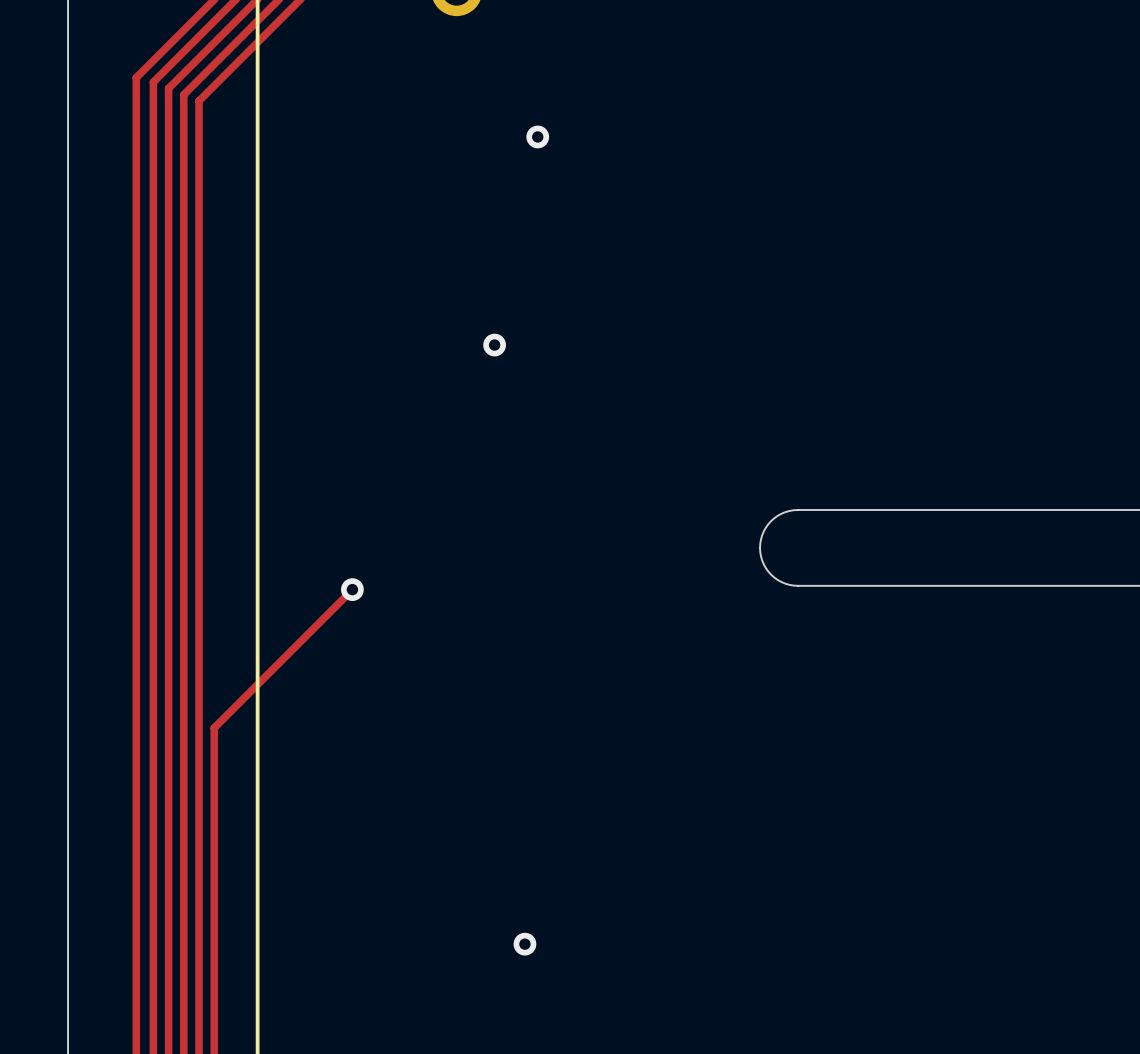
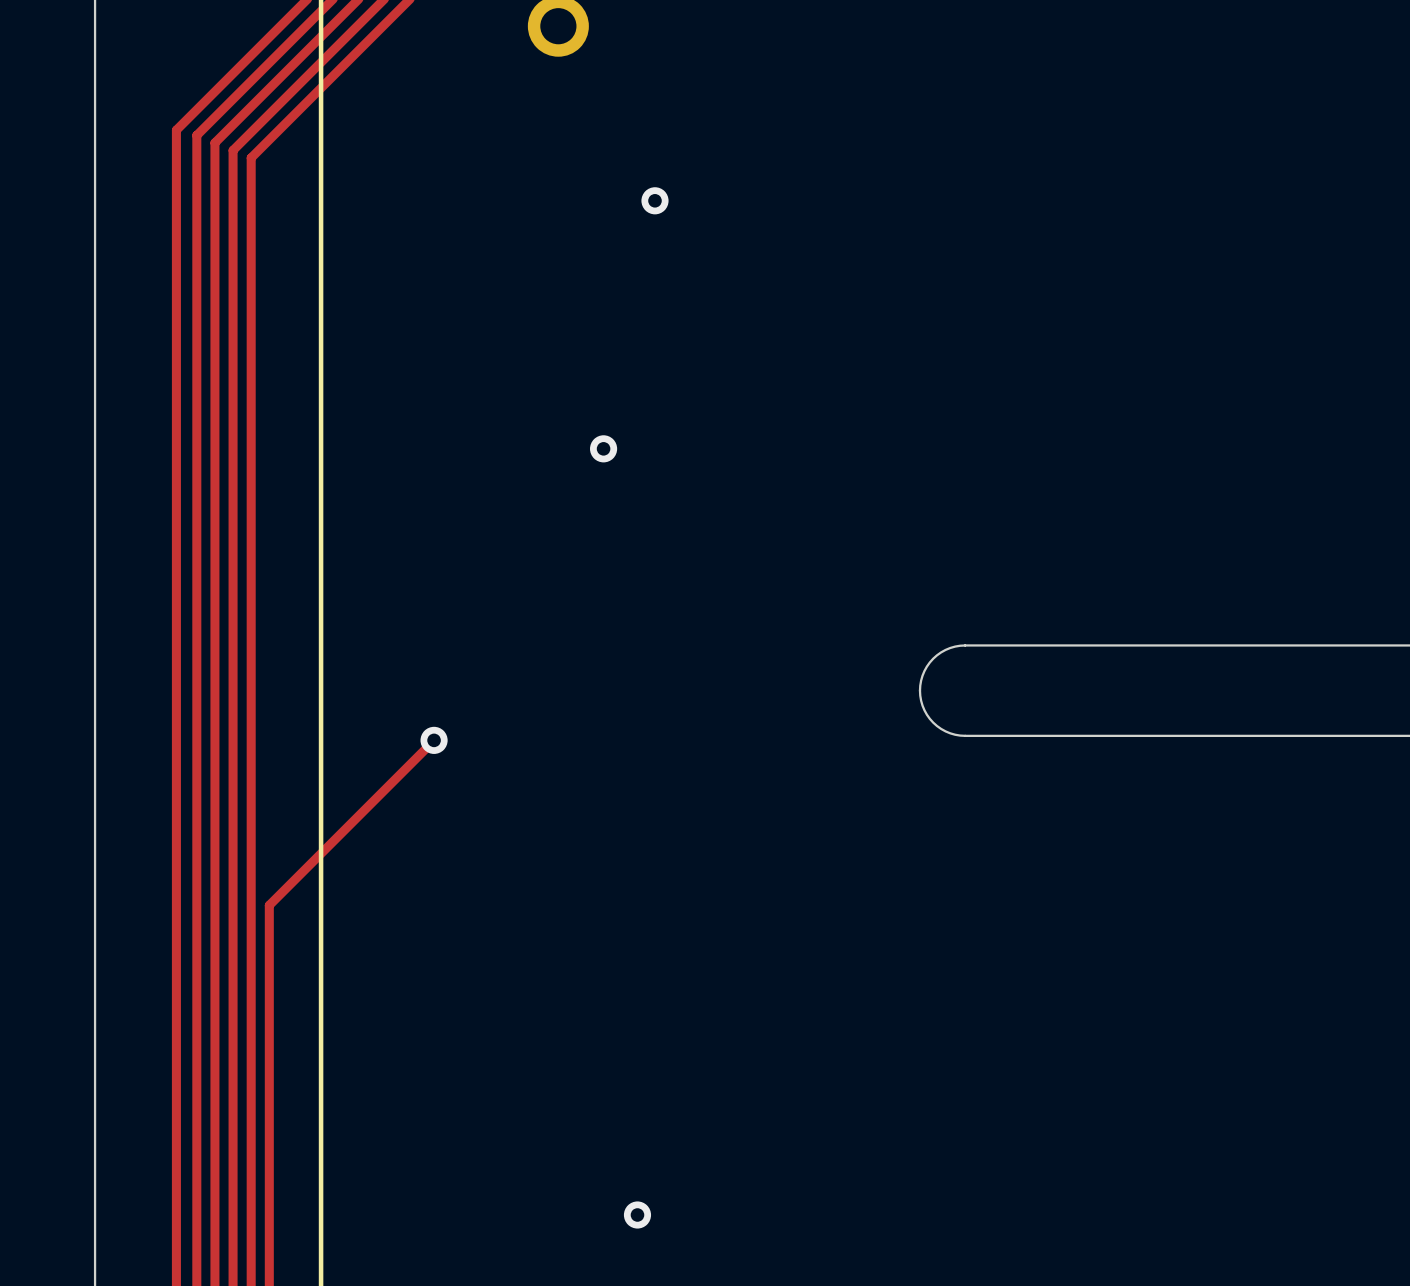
via position: (524, 944) -> (637, 1214)

